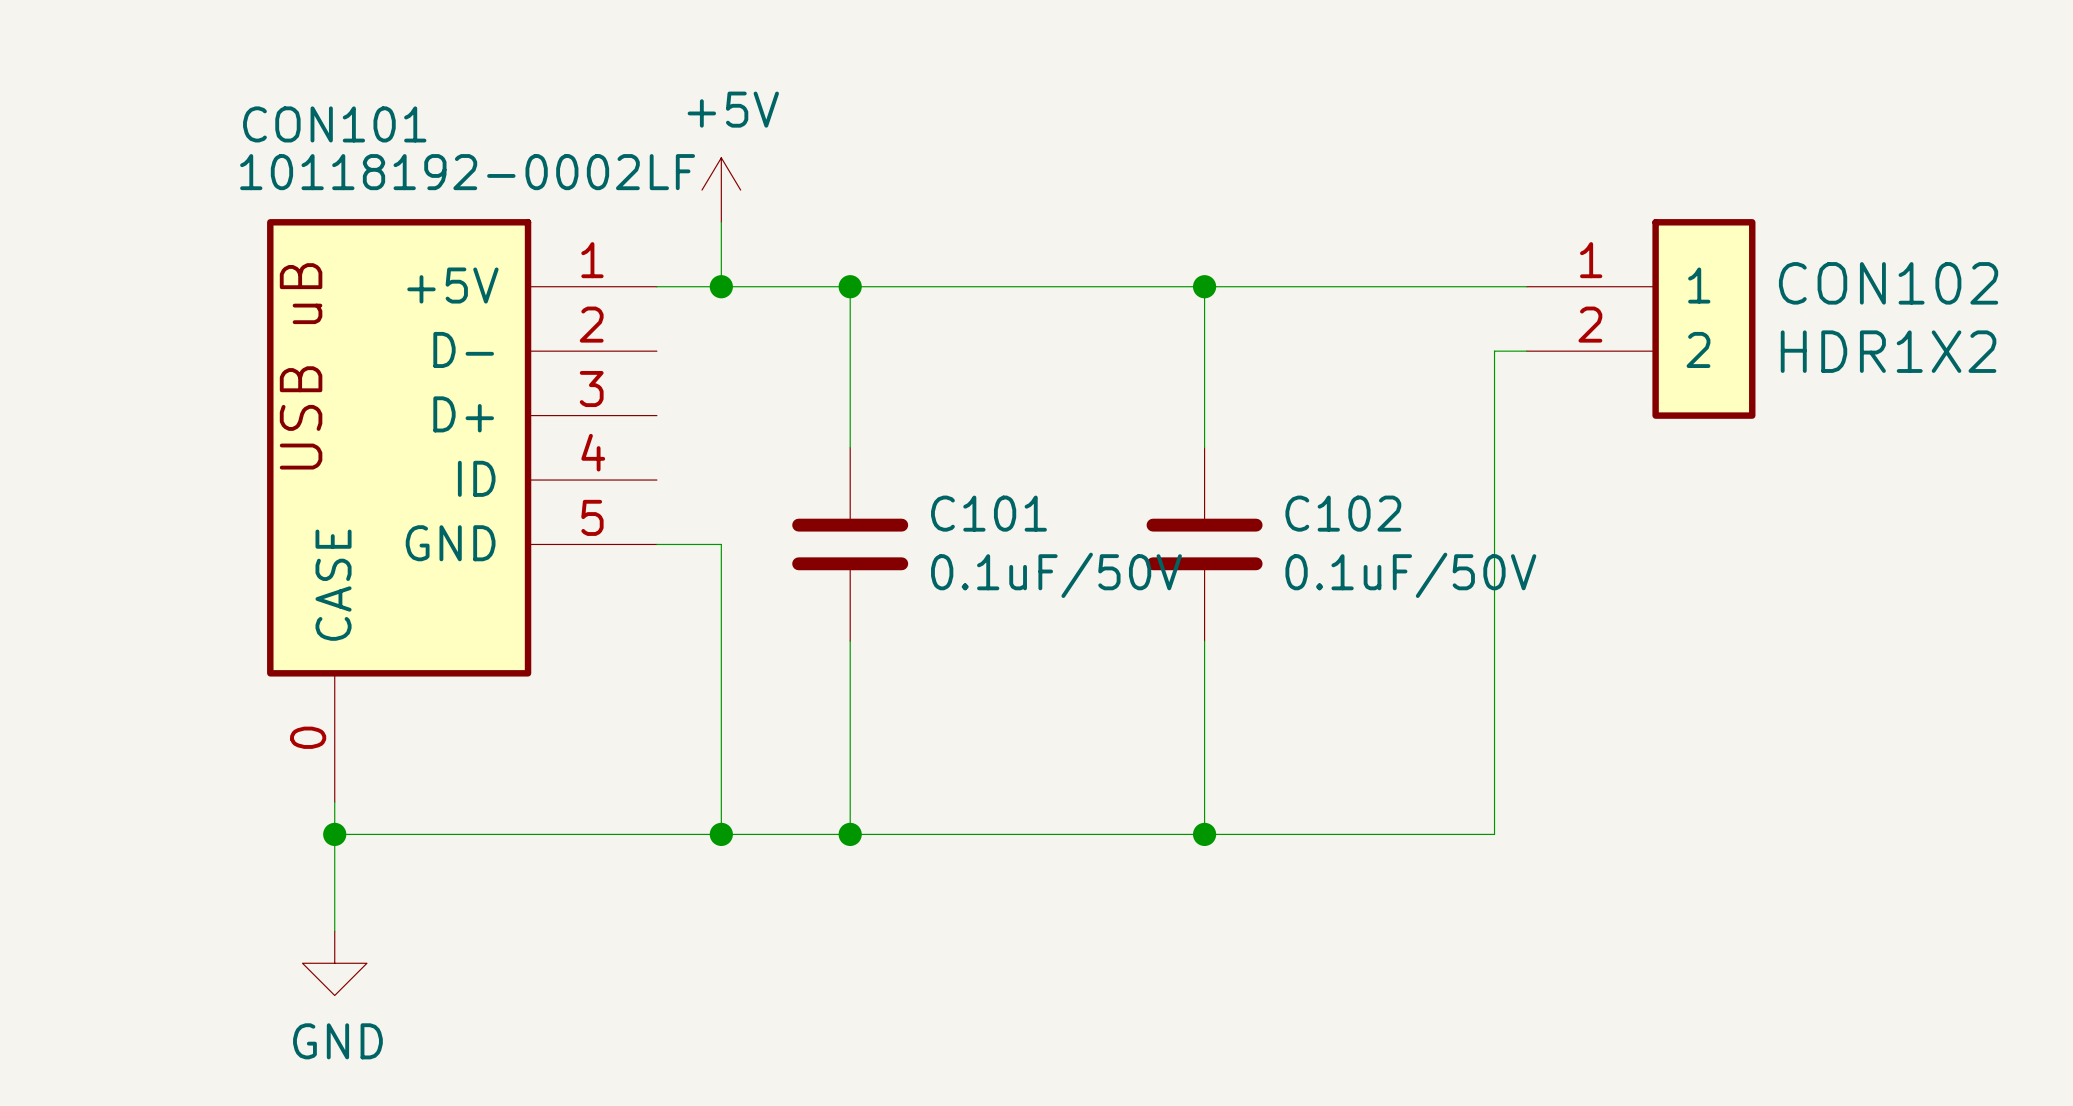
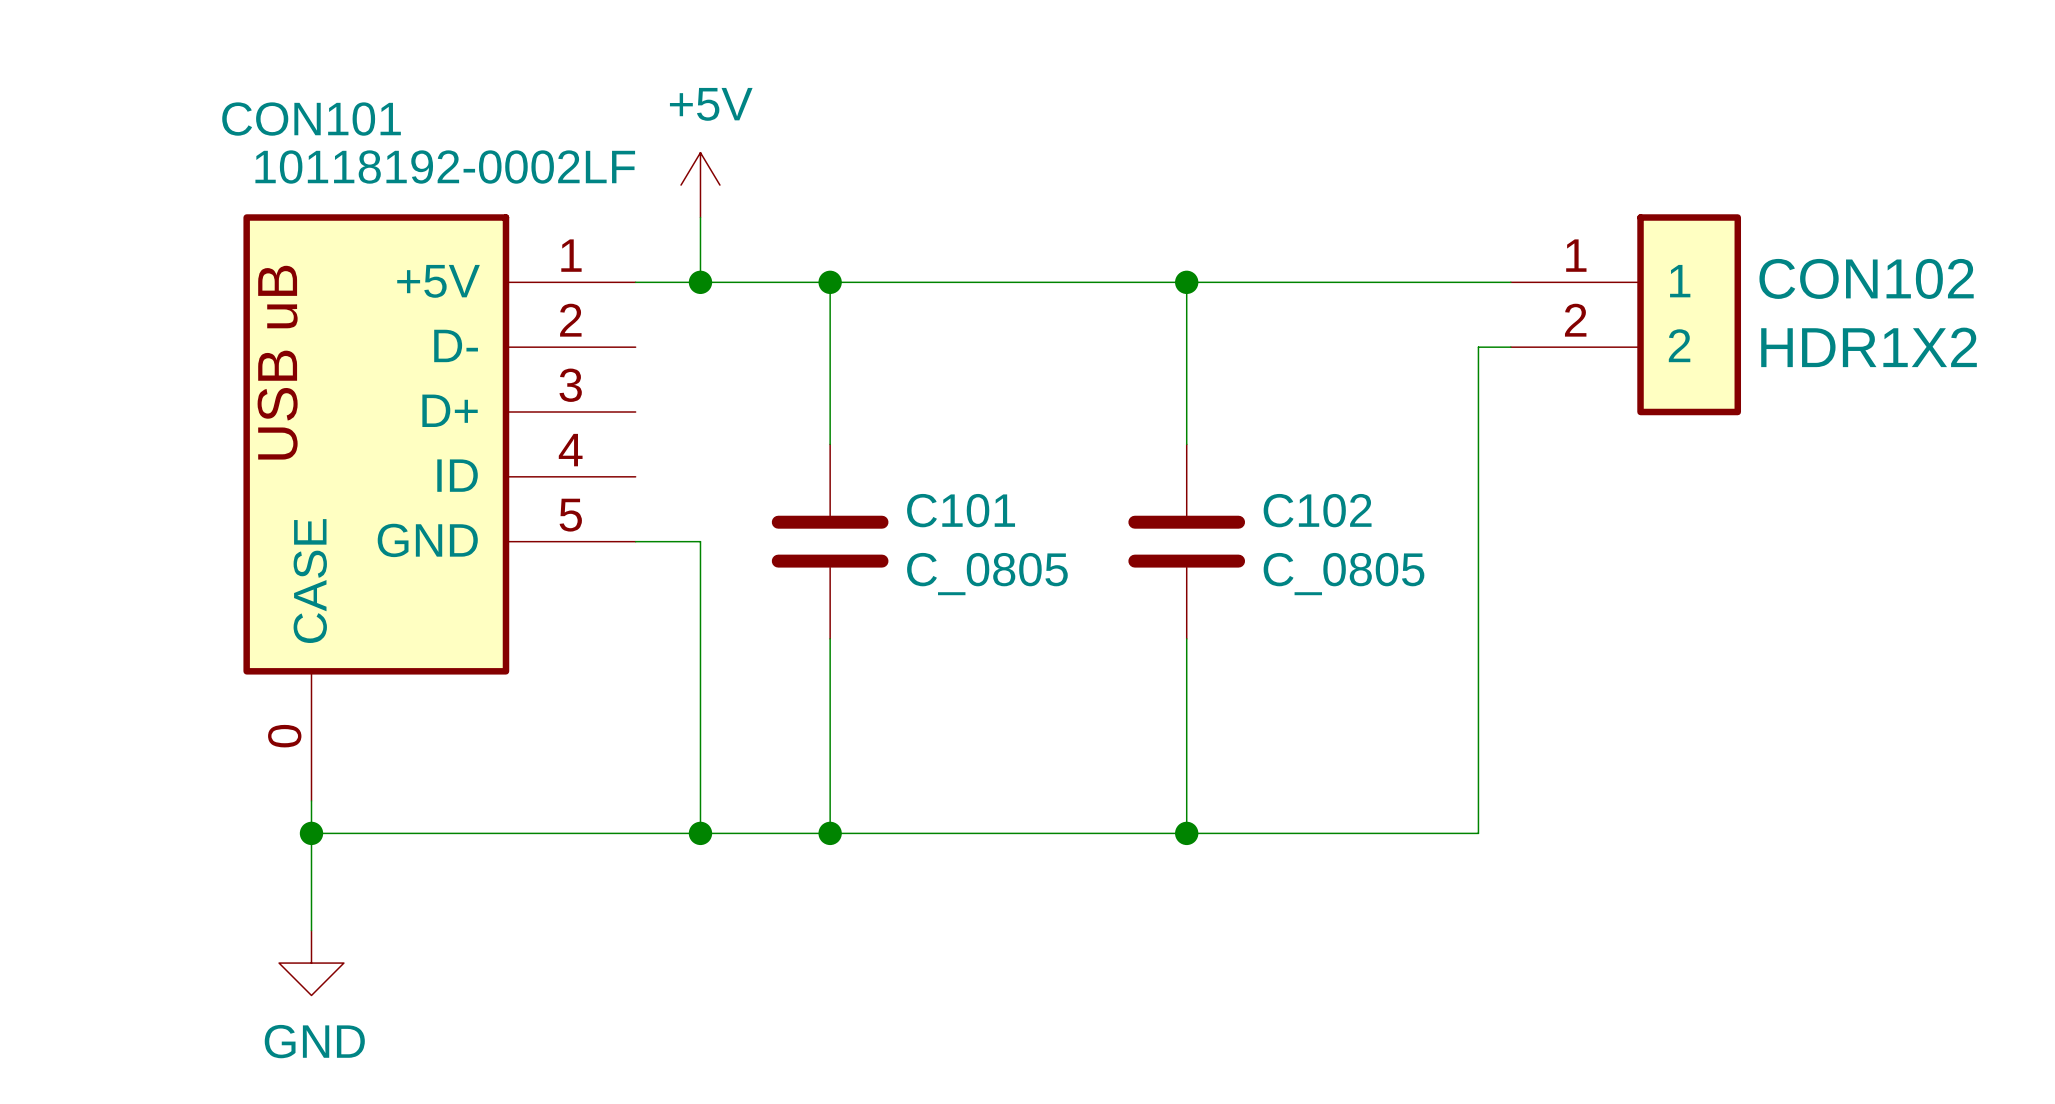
C101 value: 0.1uF/50V (1056, 575) -> C_0805 (987, 574)
C102 value: 0.1uF/50V (1410, 575) -> C_0805 (1343, 574)

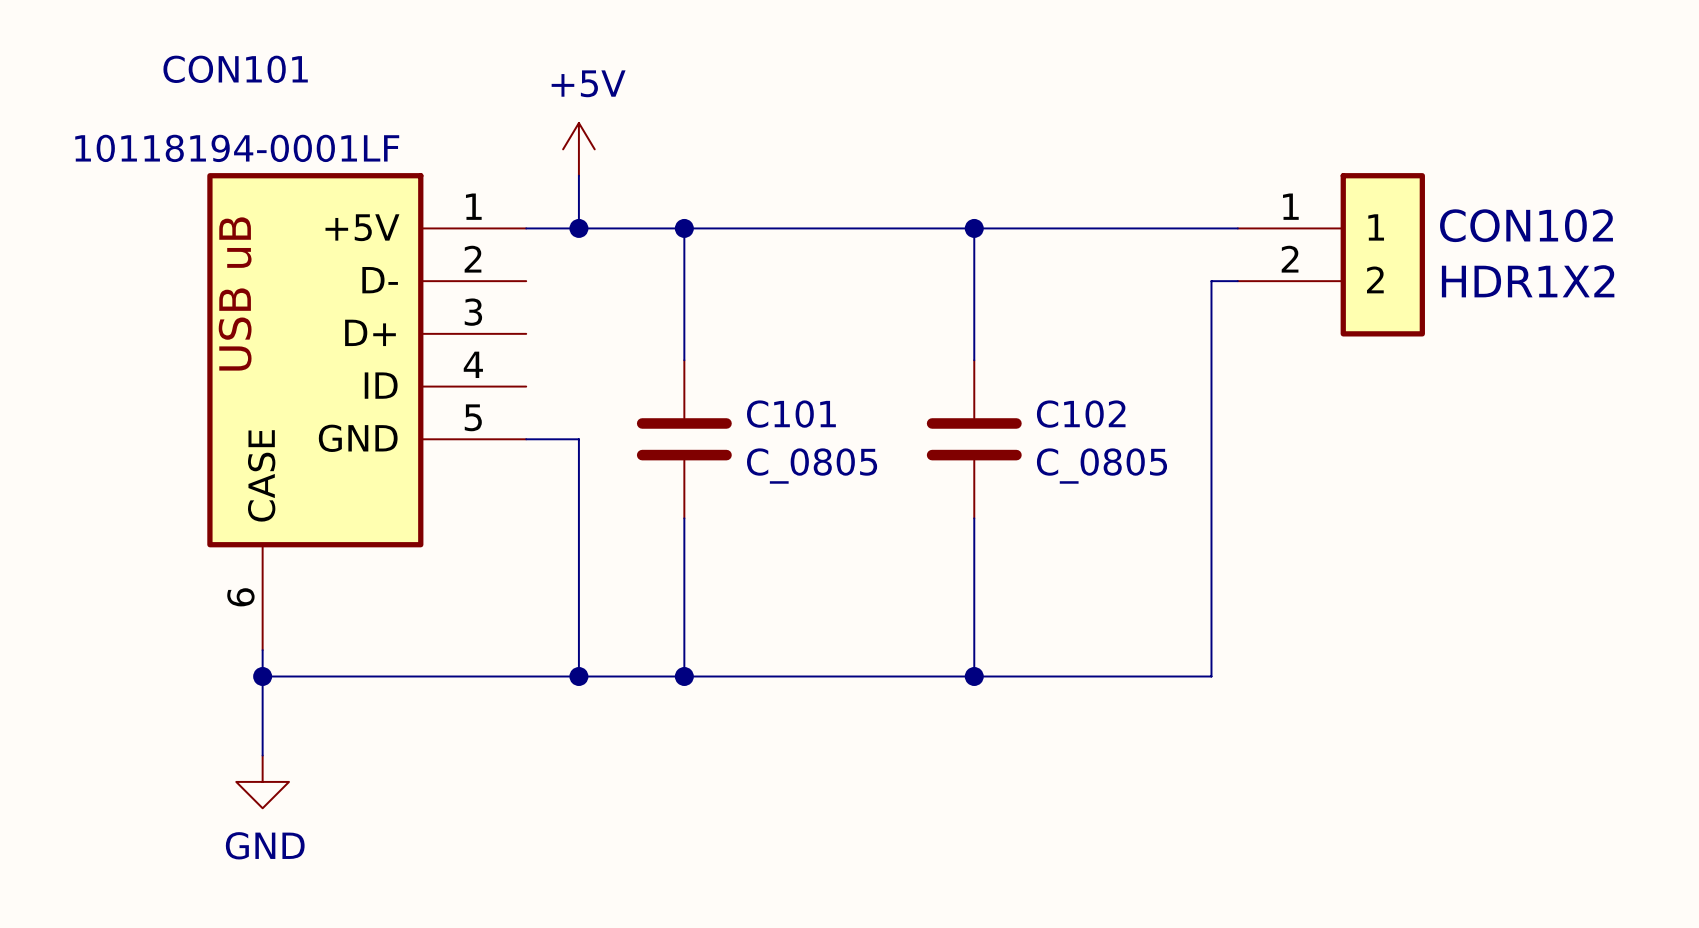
CON101 name position: CON101 (311, 119) -> CON101 (235, 69)
CON101 value: 10118192-0002LF (445, 167) -> 10118194-0001LF (237, 148)
CON101 pin number: 0 (284, 736) -> 6 (240, 597)

